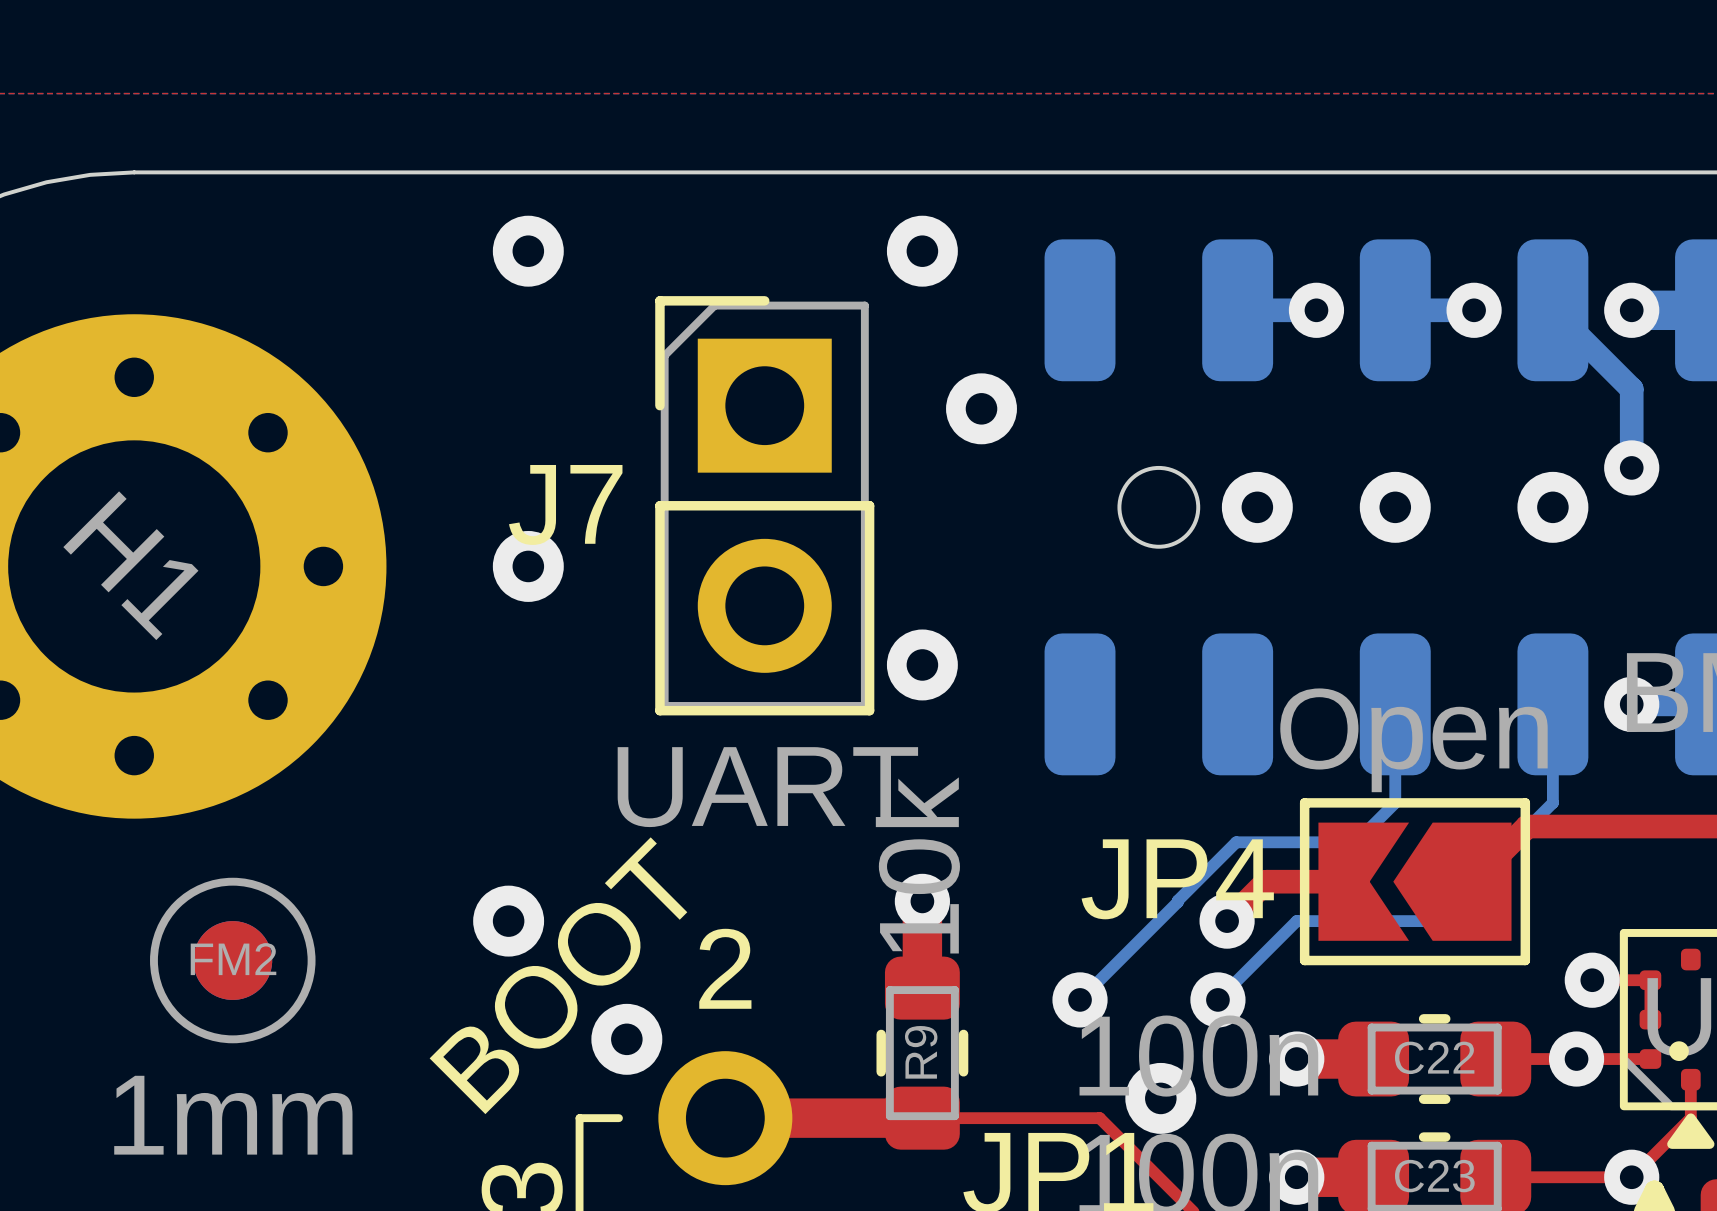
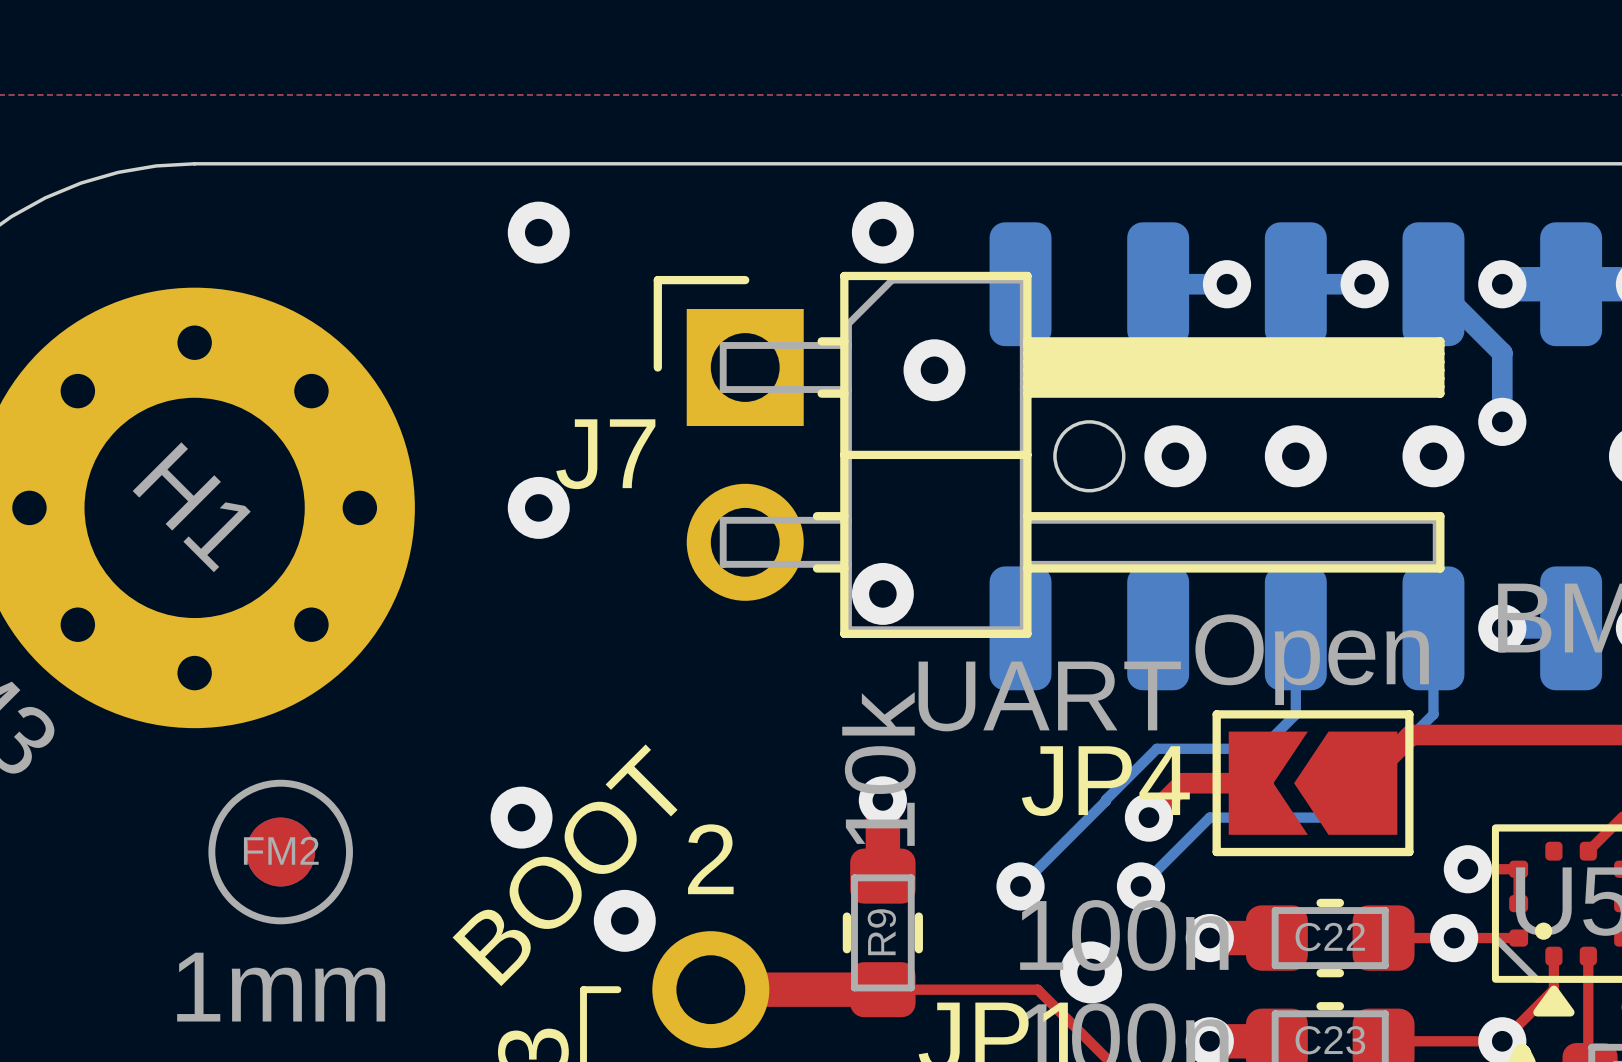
J7 footprint: [655, 296, 875, 716] -> [653, 271, 1445, 638]
J7 name position: J7 (565, 504) -> J7 (605, 454)

